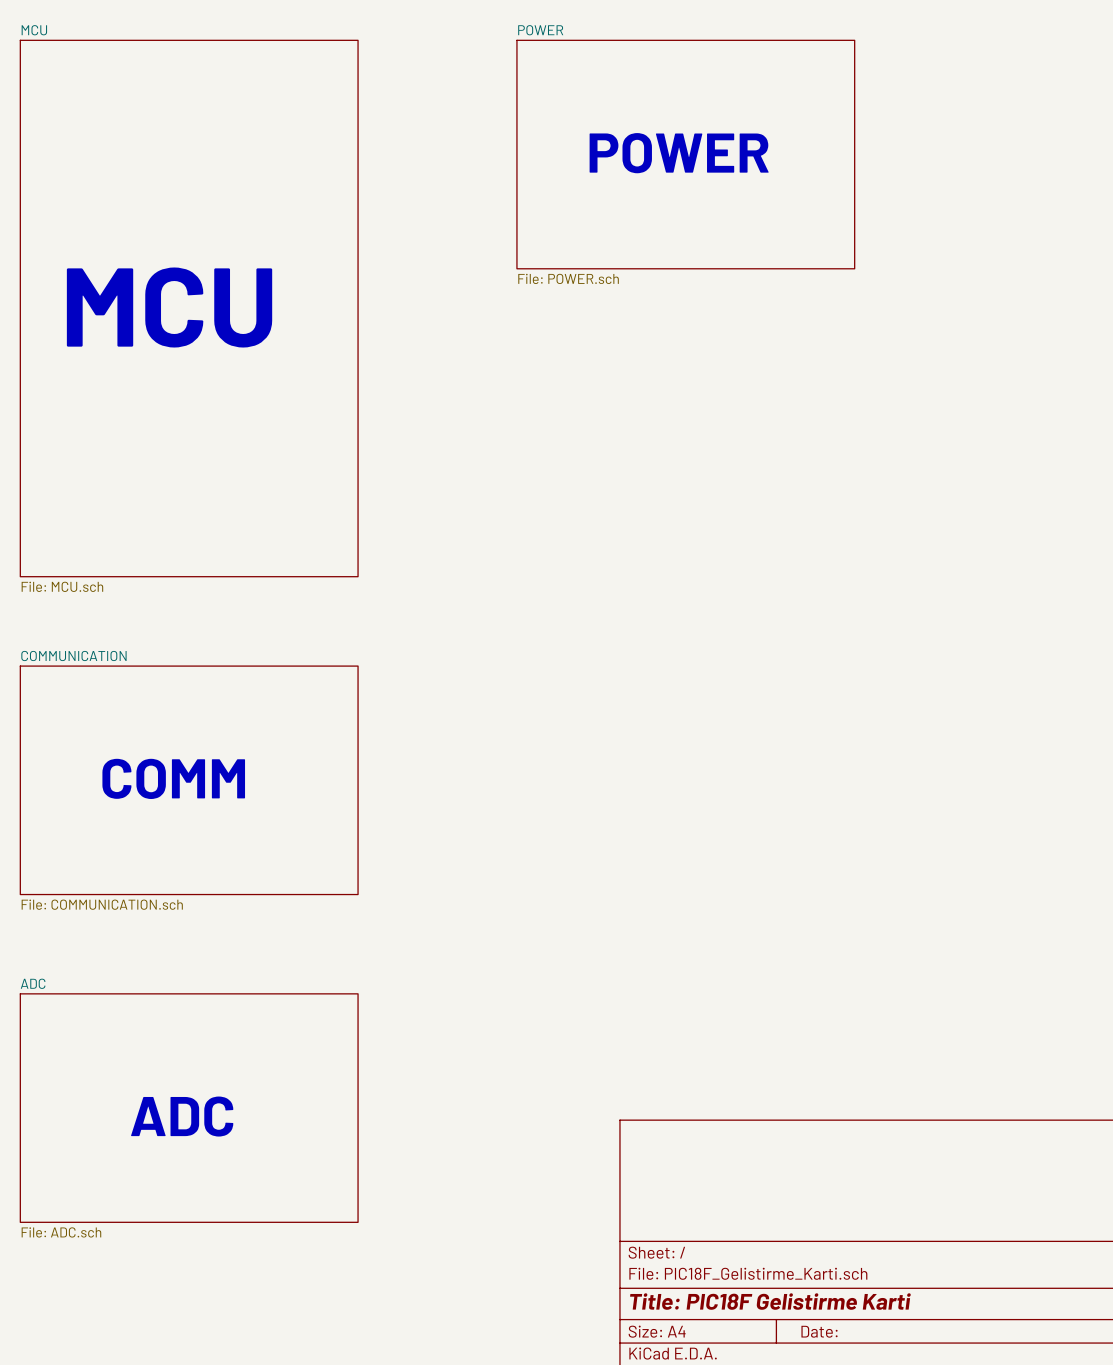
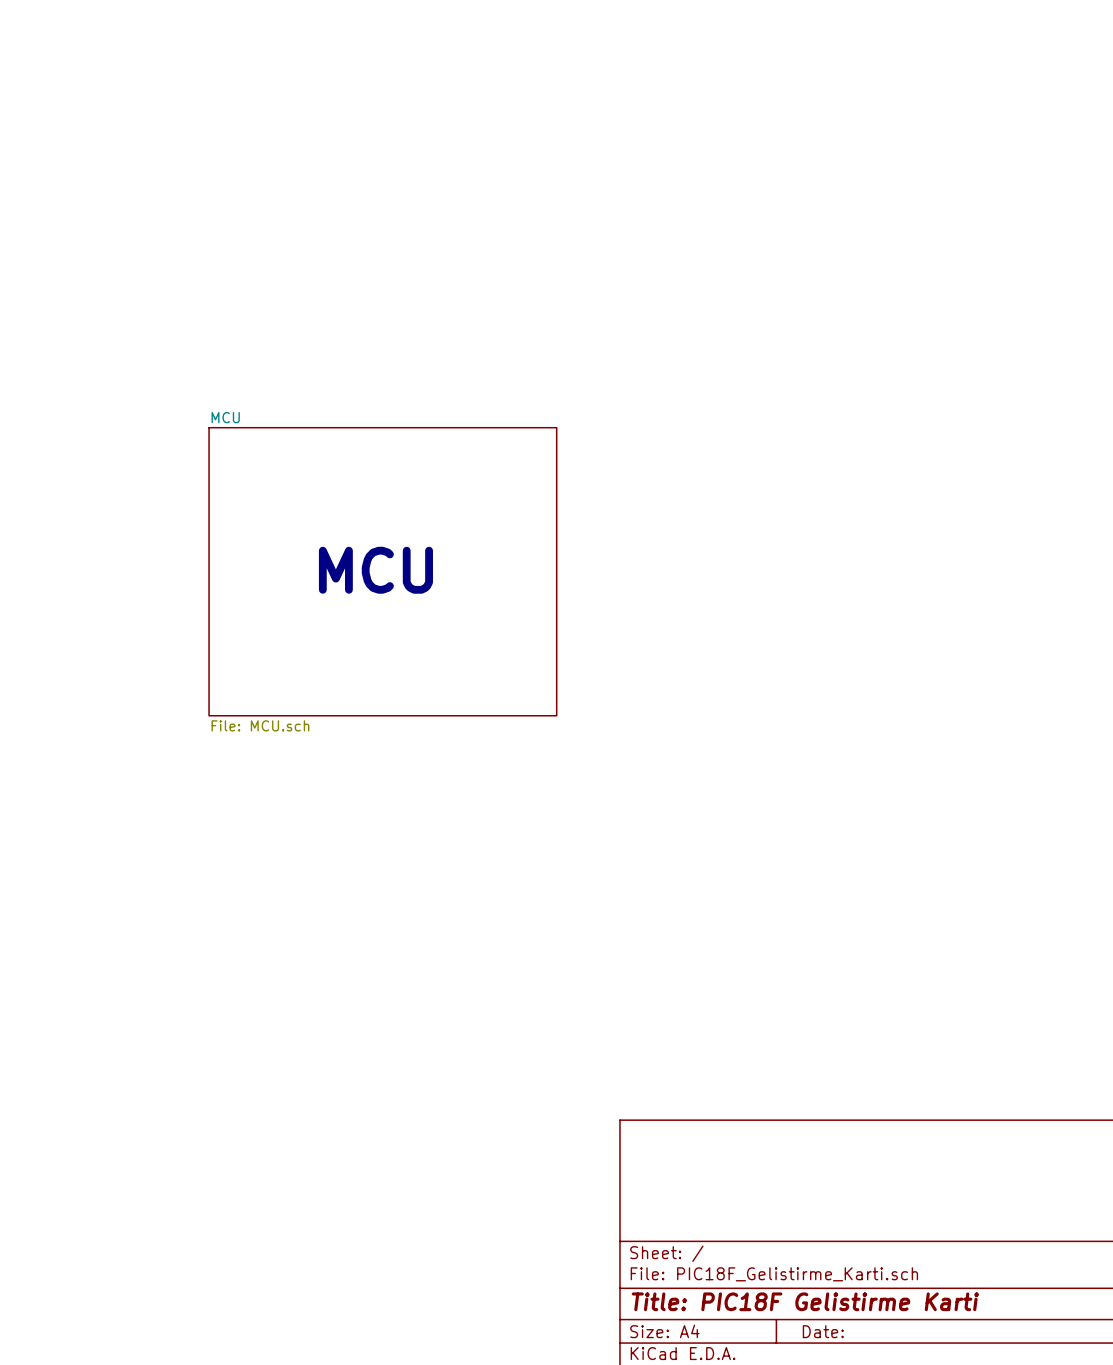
text: POWER (679, 153) -> none
sheet POWER: File: POWER.sch (685, 154) -> none
text: MCU (169, 307) -> none
sheet MCU: File: MCU.sch (189, 308) -> none
text: none -> MCU (375, 570)
sheet MCU: none -> File: MCU.sch (382, 571)
text: COMM (173, 778) -> none
sheet COMMUNICATION: File: COMMUNICATION.sch (189, 780) -> none
sheet ADC: File: ADC.sch (189, 1108) -> none
text: ADC (182, 1116) -> none

